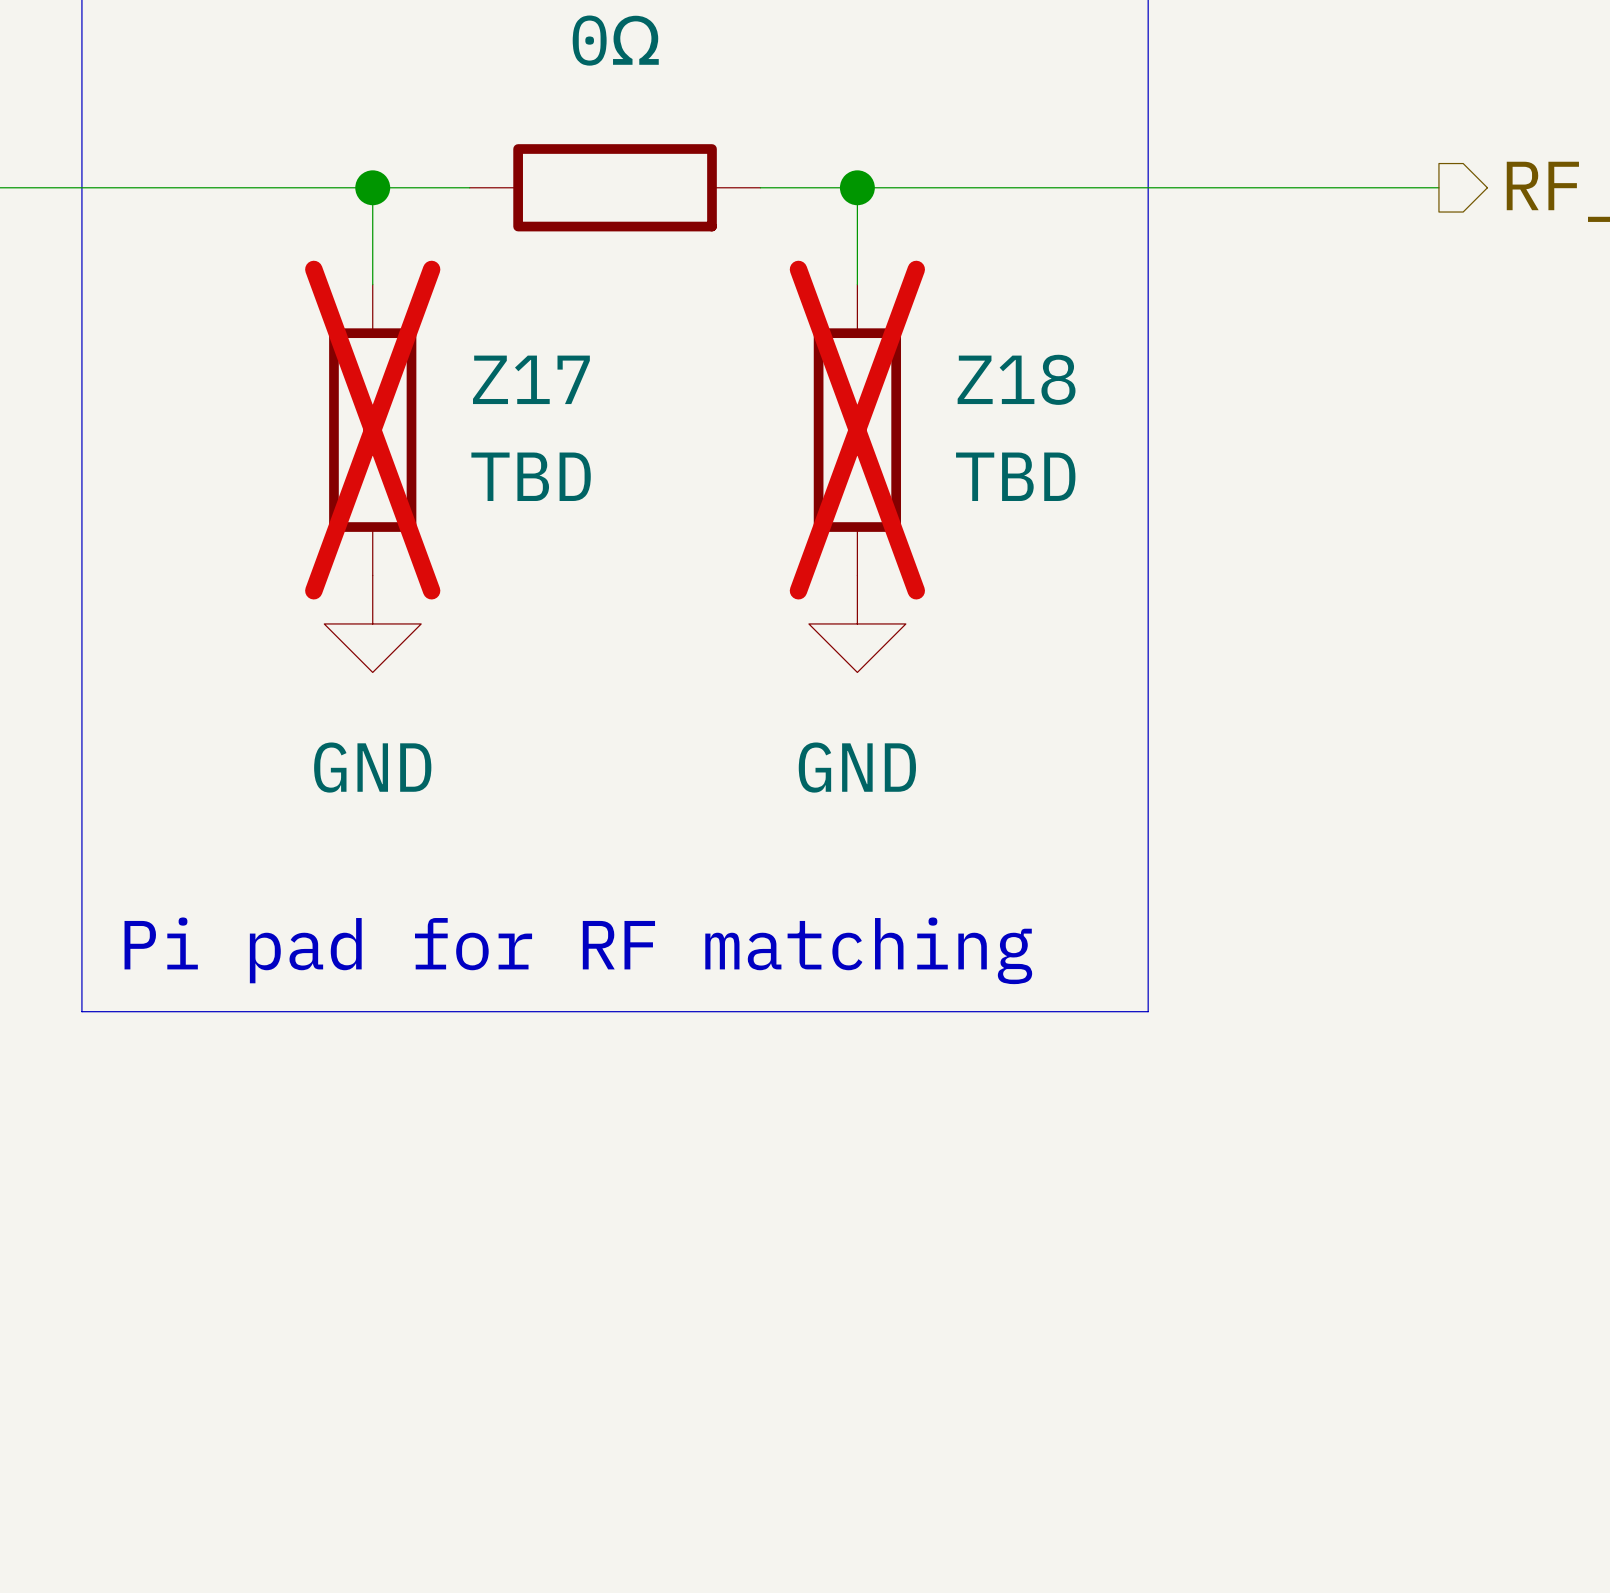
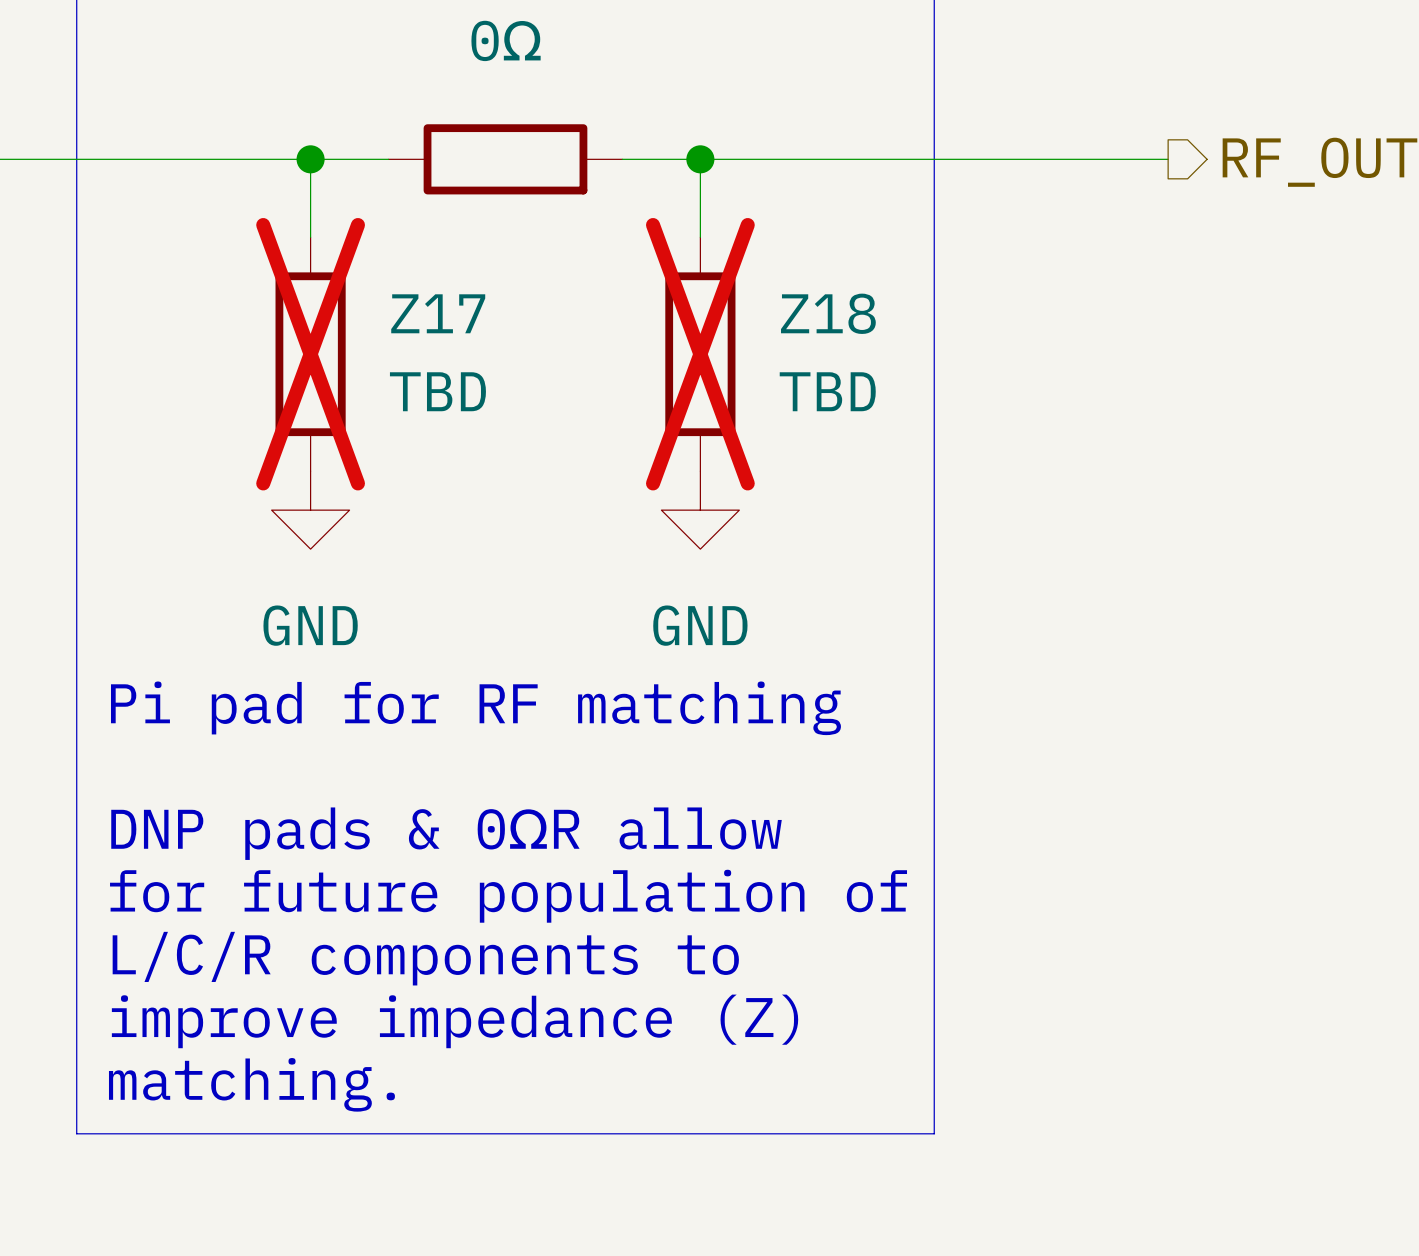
text position: Pi pad for RF matching (578, 950) -> Pi pad for RF matching (475, 708)
line: (81, 1011) (1148, 1011) -> (76, 821) (76, 1133) (934, 1133) (934, 821)
text: none -> DNP pads & 0ΩR allow (446, 833)
text: none -> for future population of (508, 896)
text: none -> L/C/R components to (425, 958)
text: none -> improve impedance (Z) (455, 1021)
text: none -> matching. (251, 1084)

